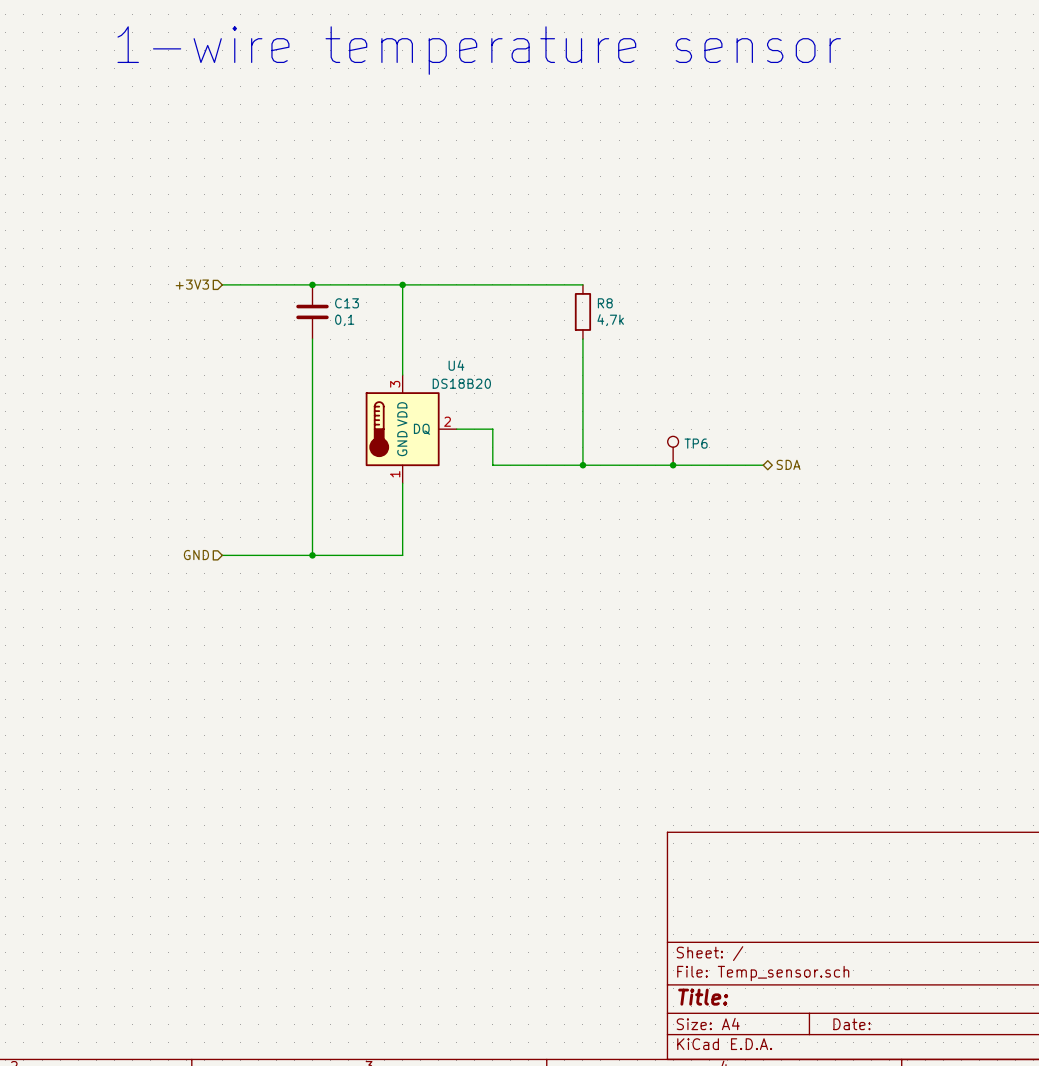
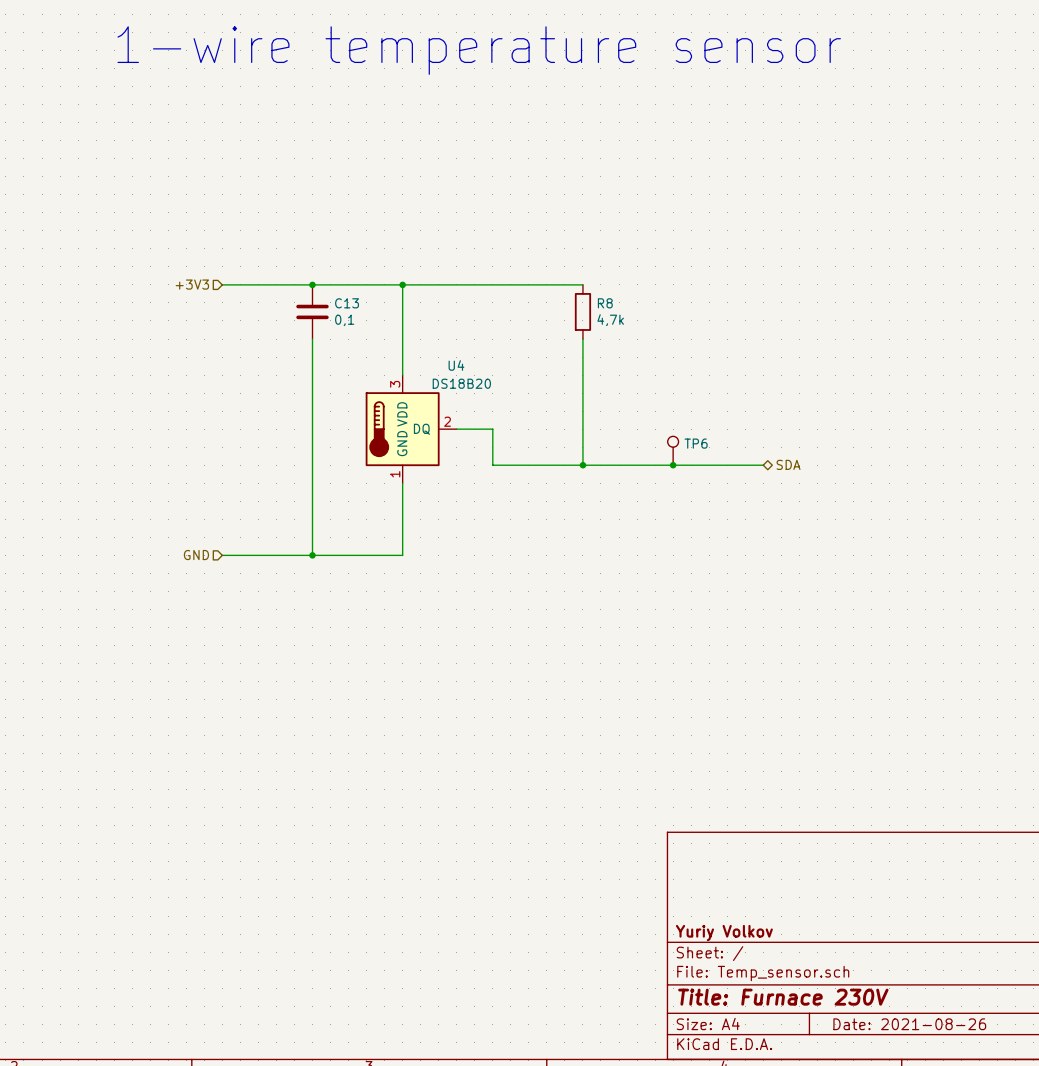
title block: none -> Yuriy Volkov (724, 933)
title block: Title: (703, 997) -> Title: Furnace 230V (783, 997)
title block: Date: (851, 1024) -> Date: 2021-08-26 (909, 1024)

